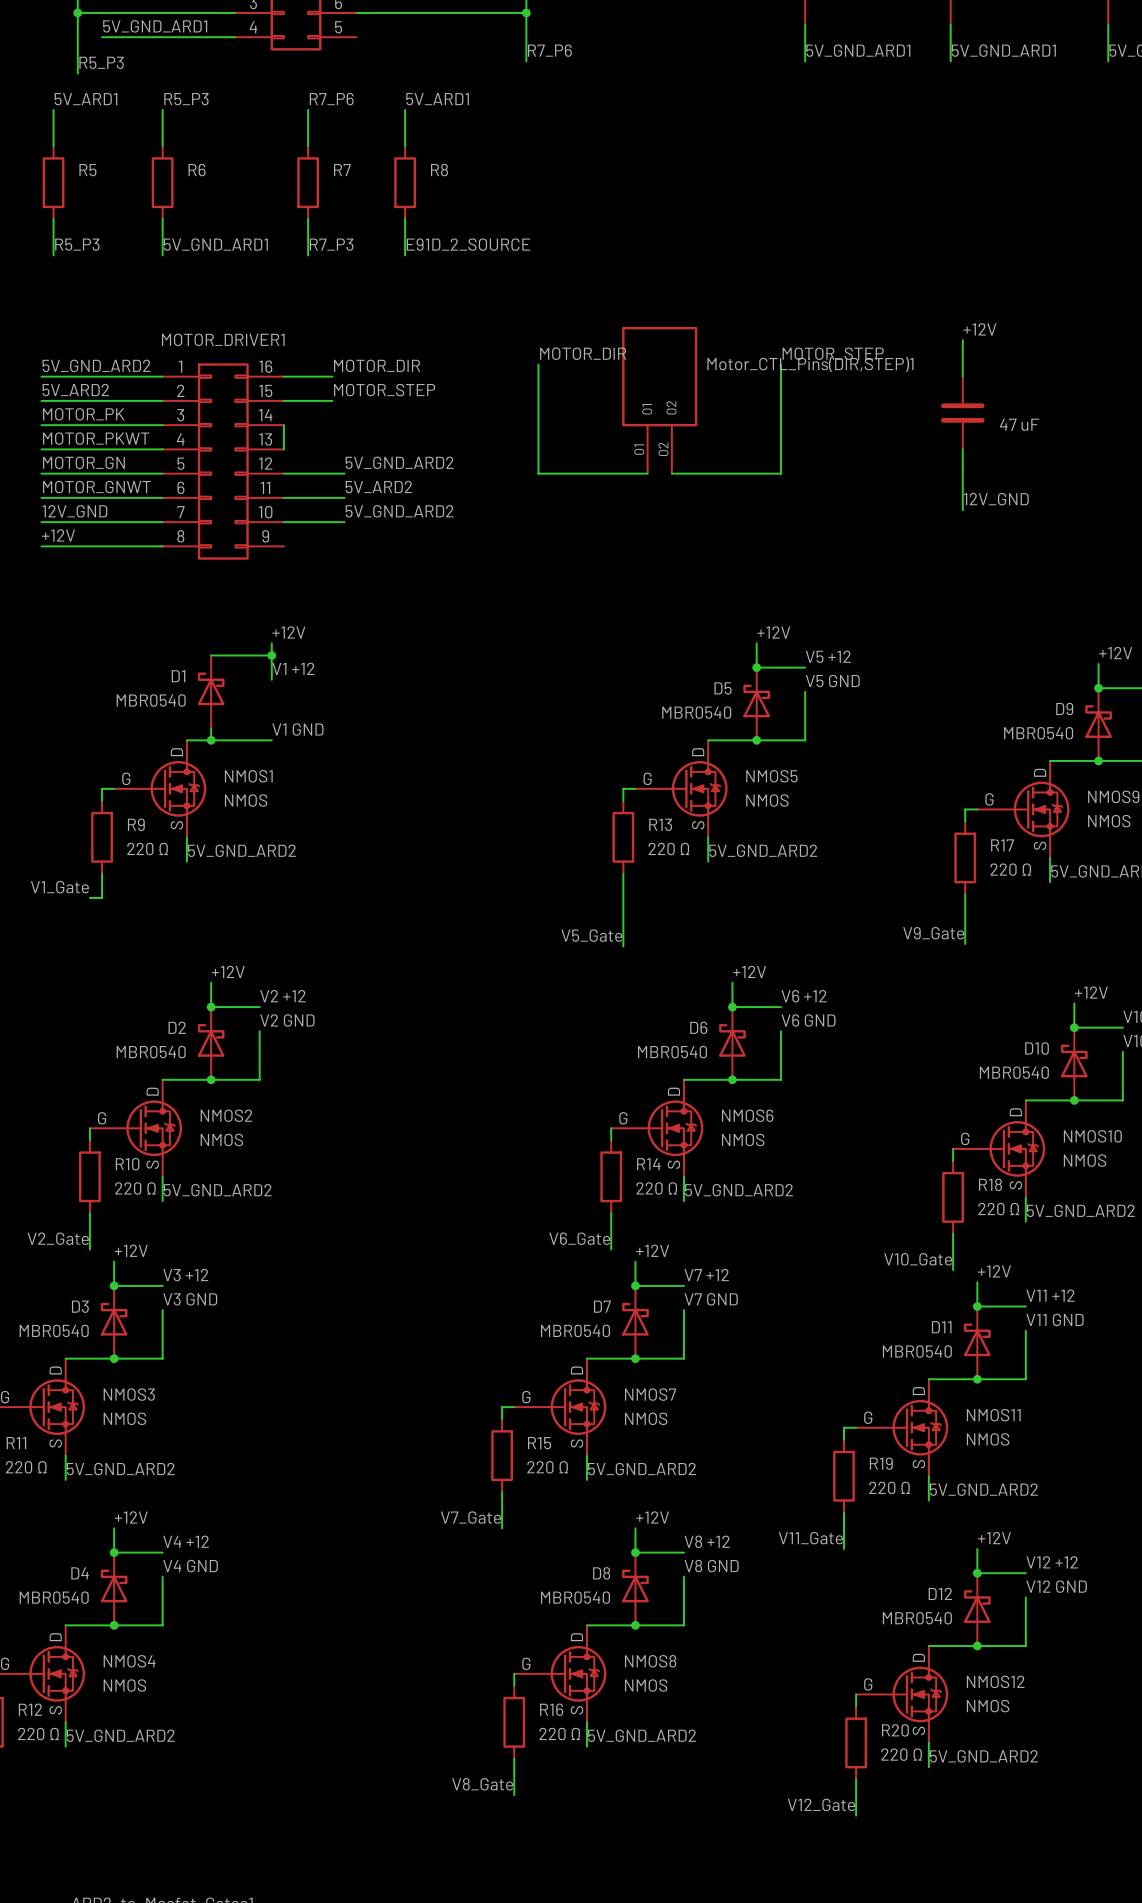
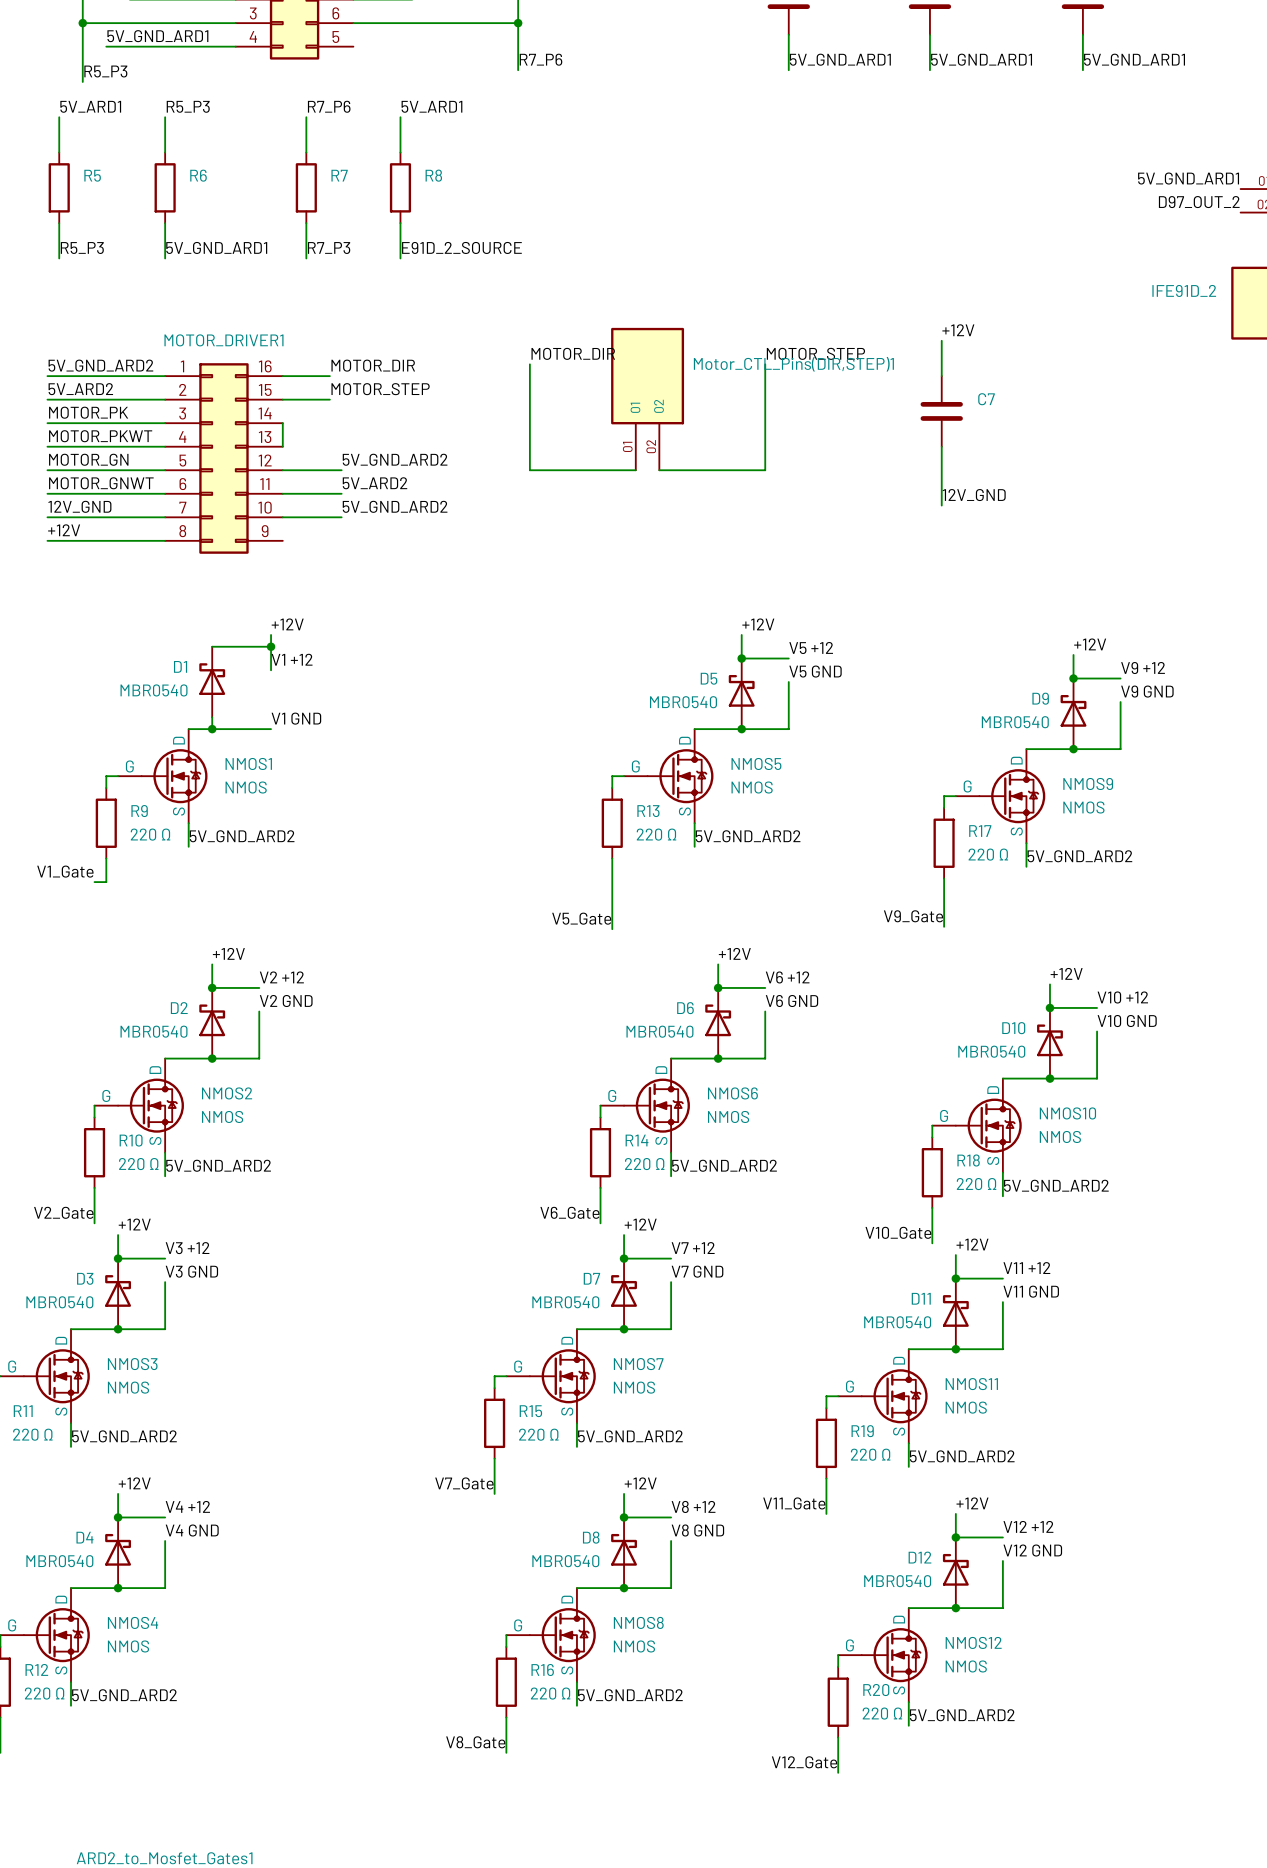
C7 name: none -> C7 (986, 399)
C7 value: 47 uF (1019, 424) -> none

